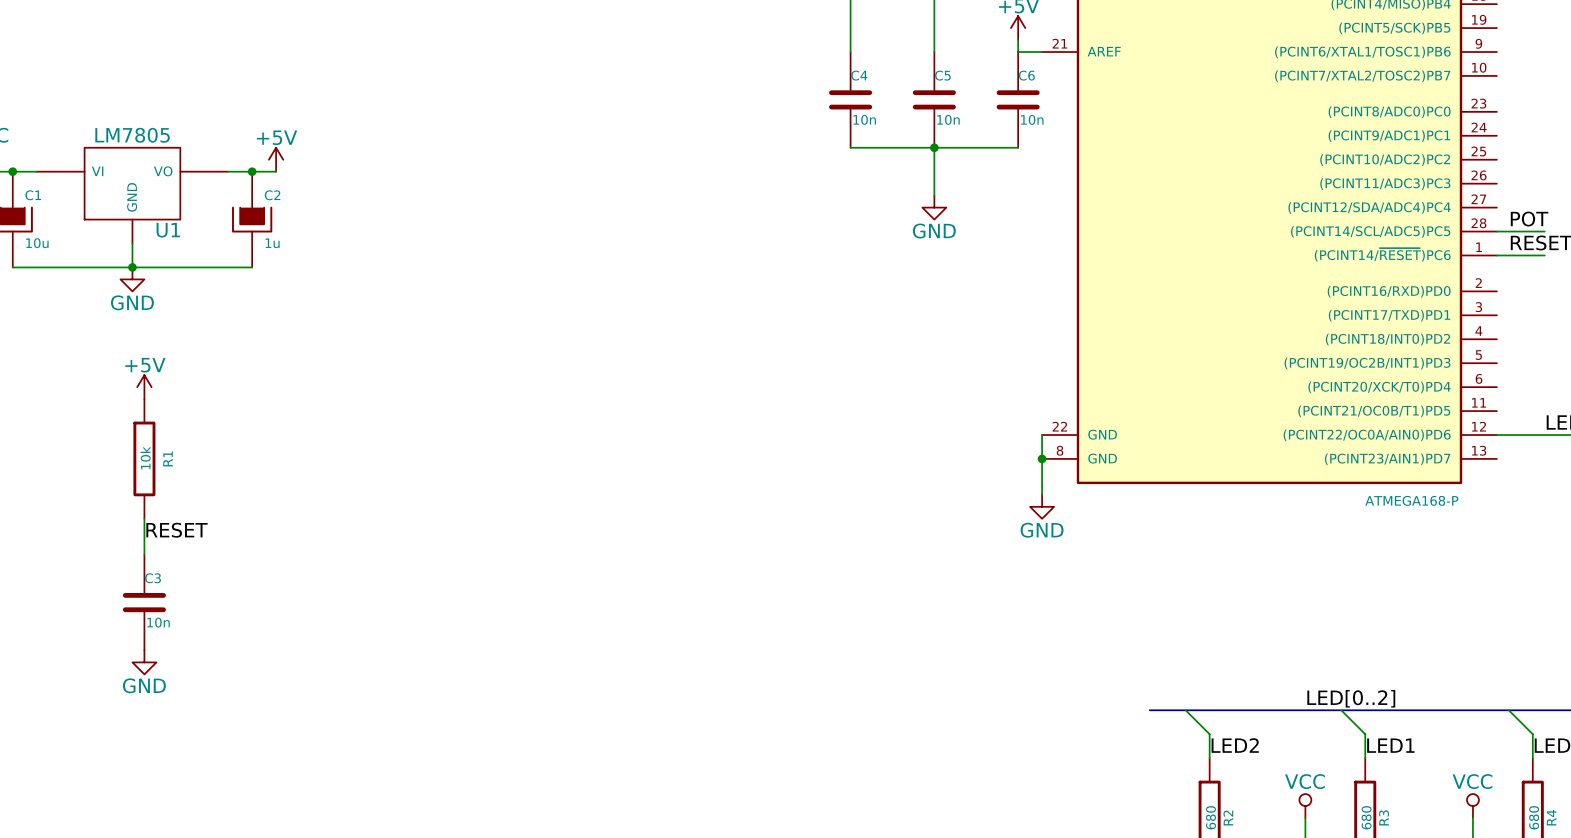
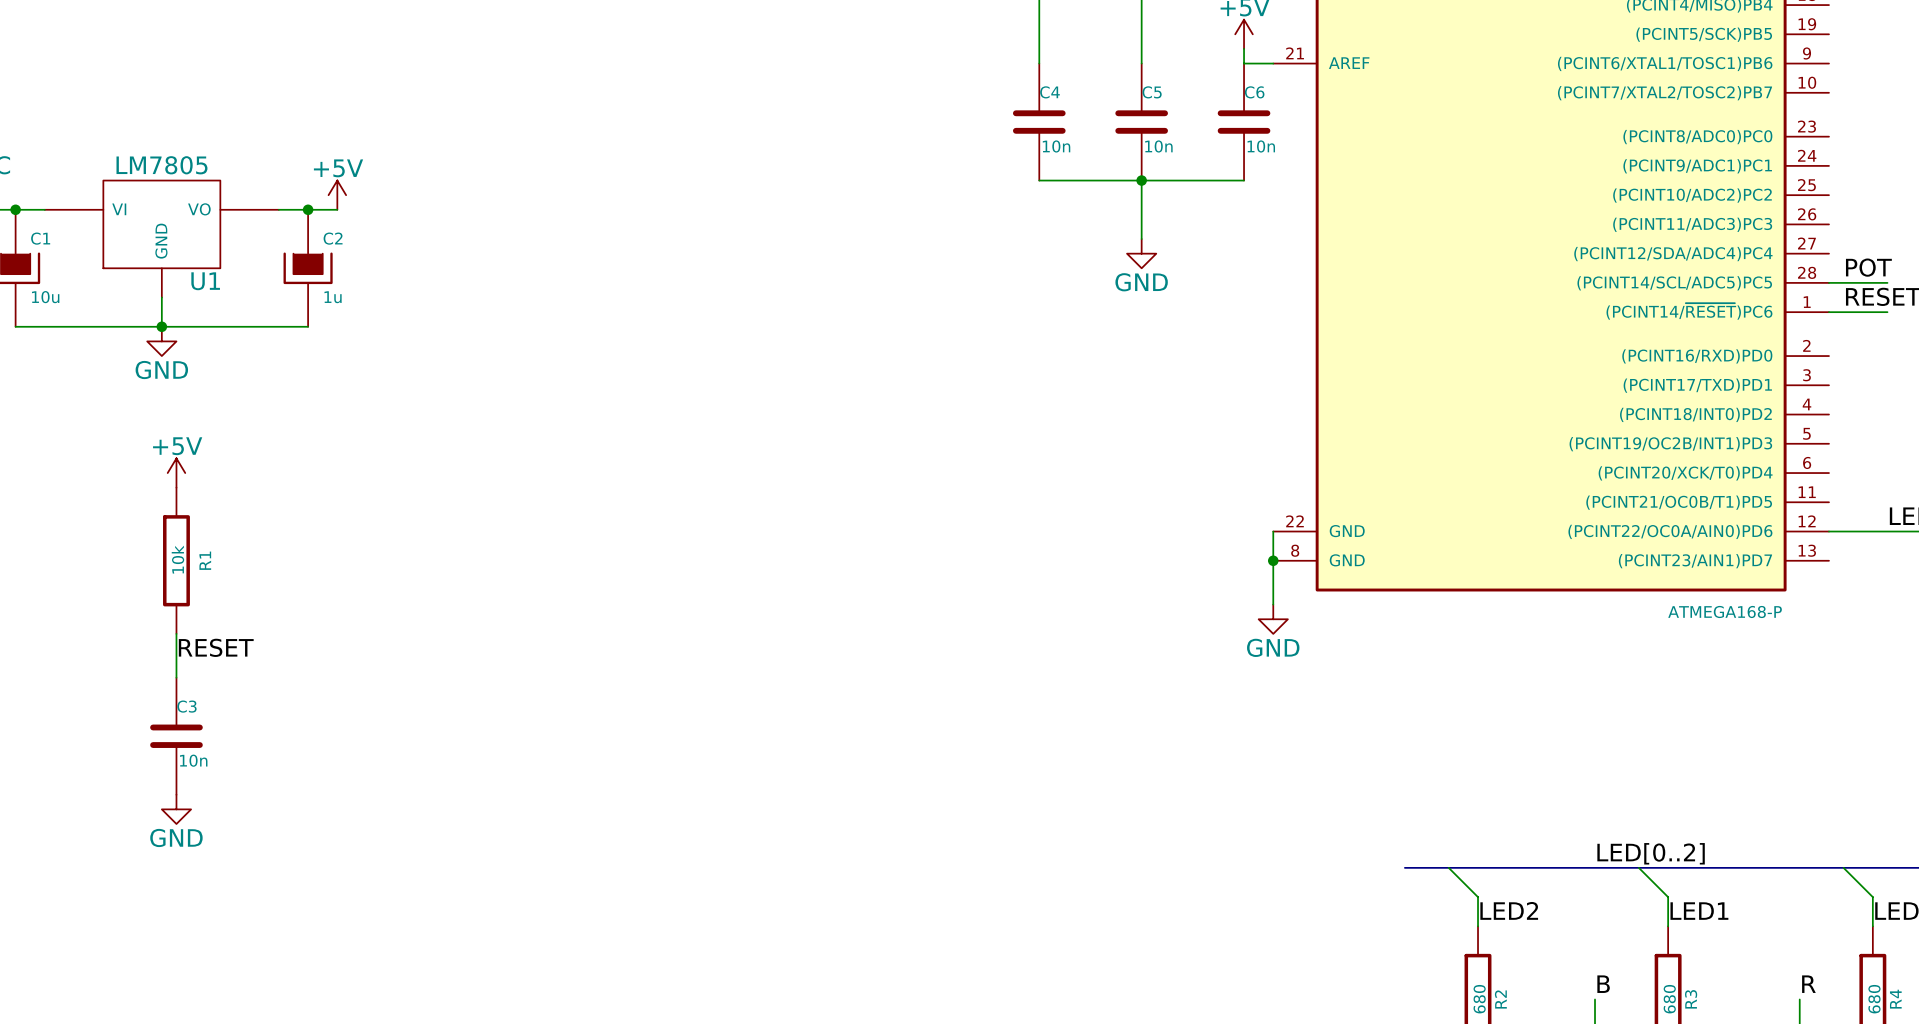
label: none -> B (1603, 984)
label: none -> R (1808, 984)
power symbol: VCC (1305, 806) -> none
power symbol: VCC (1472, 806) -> none

